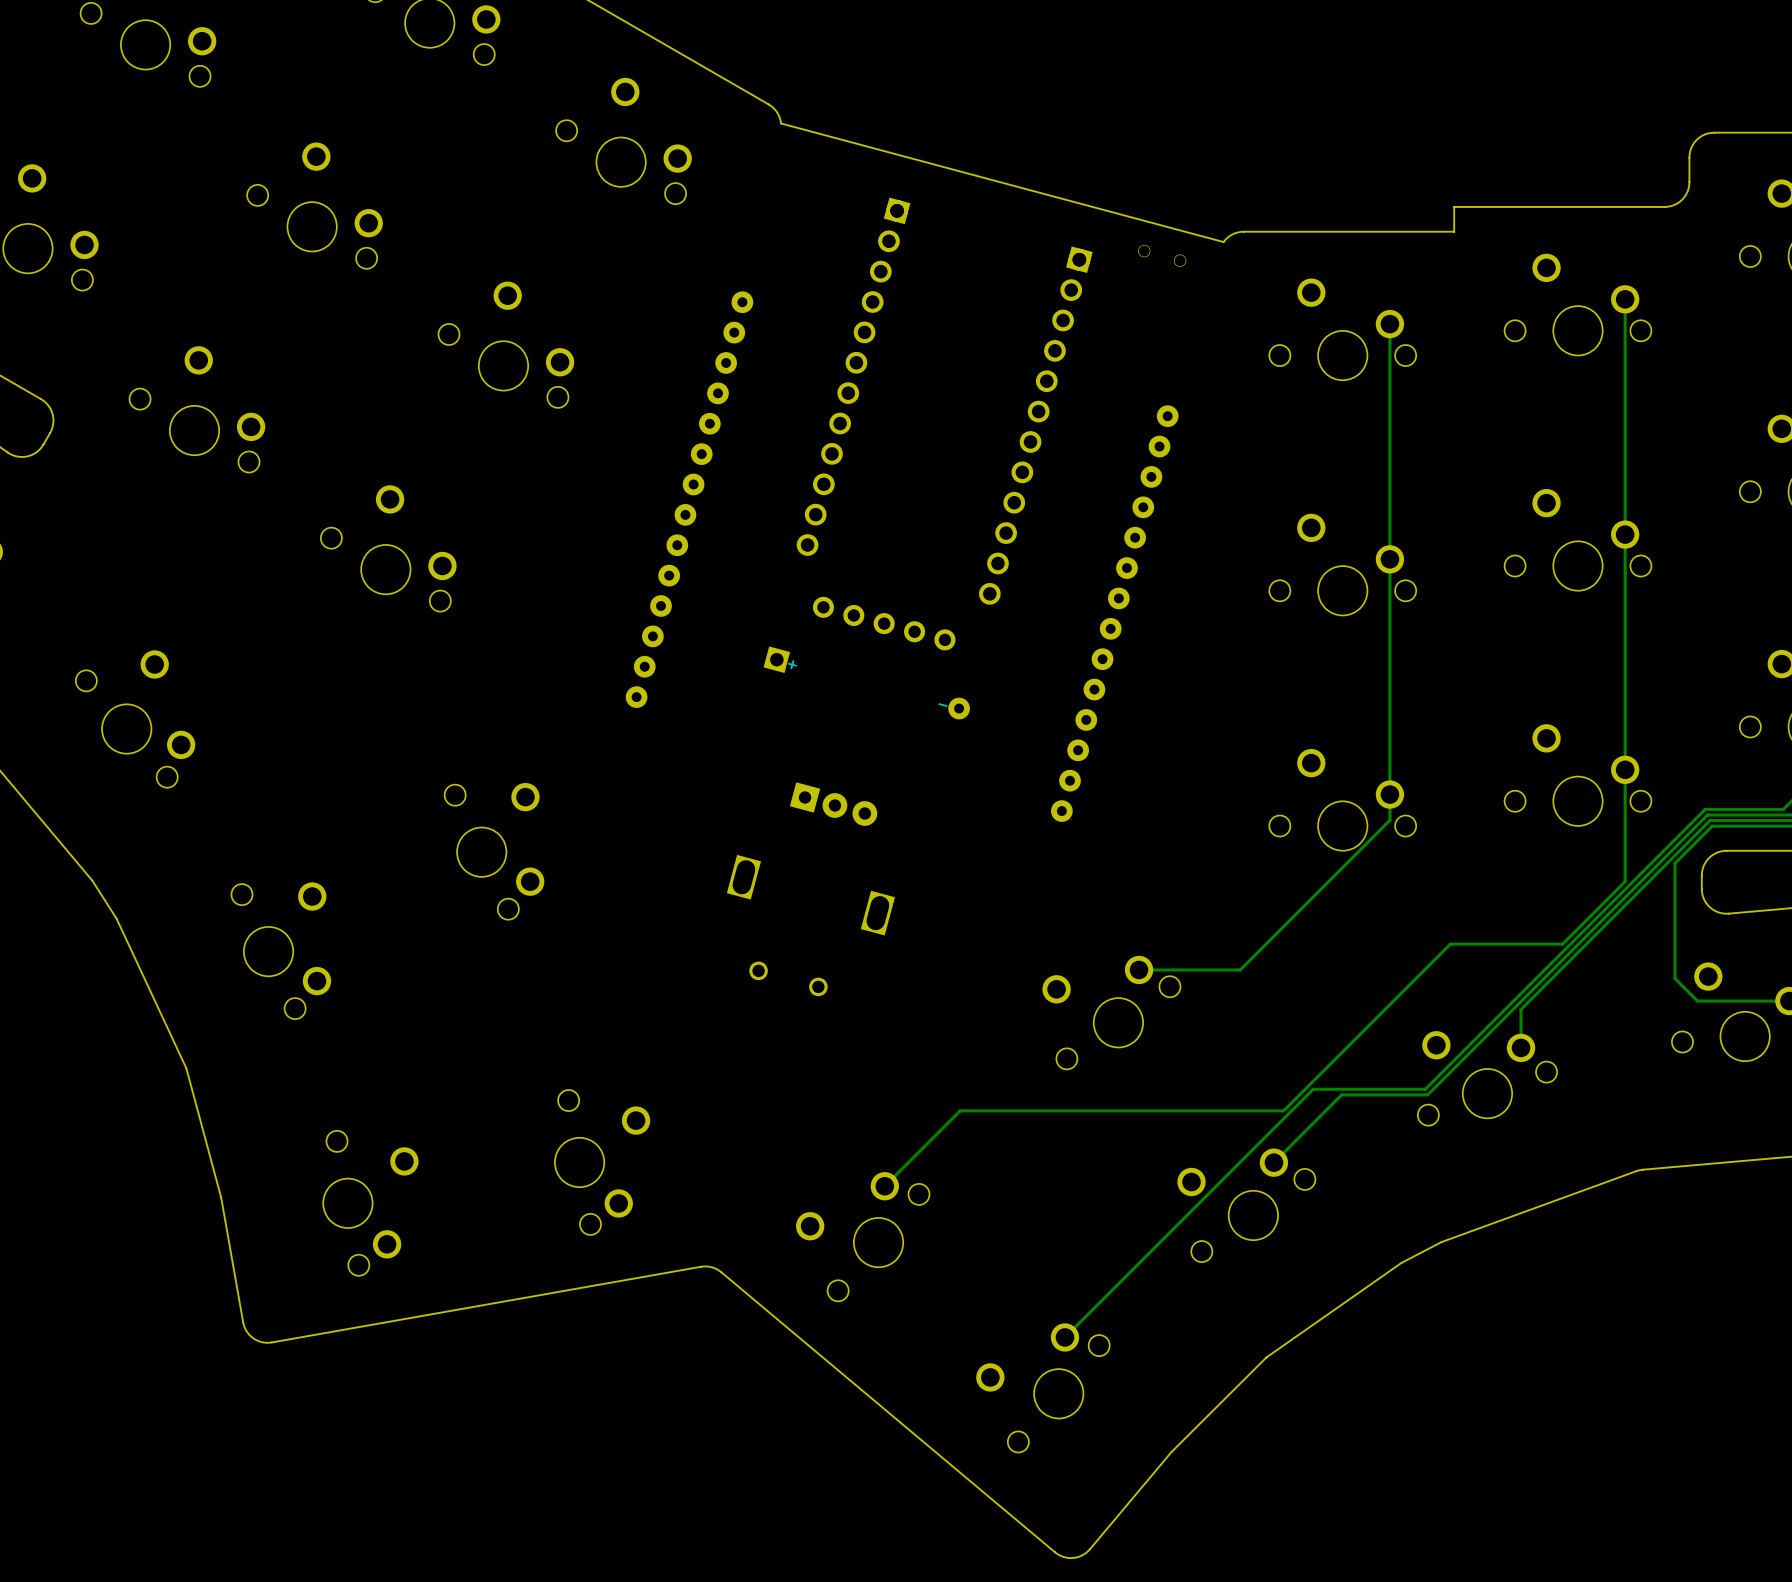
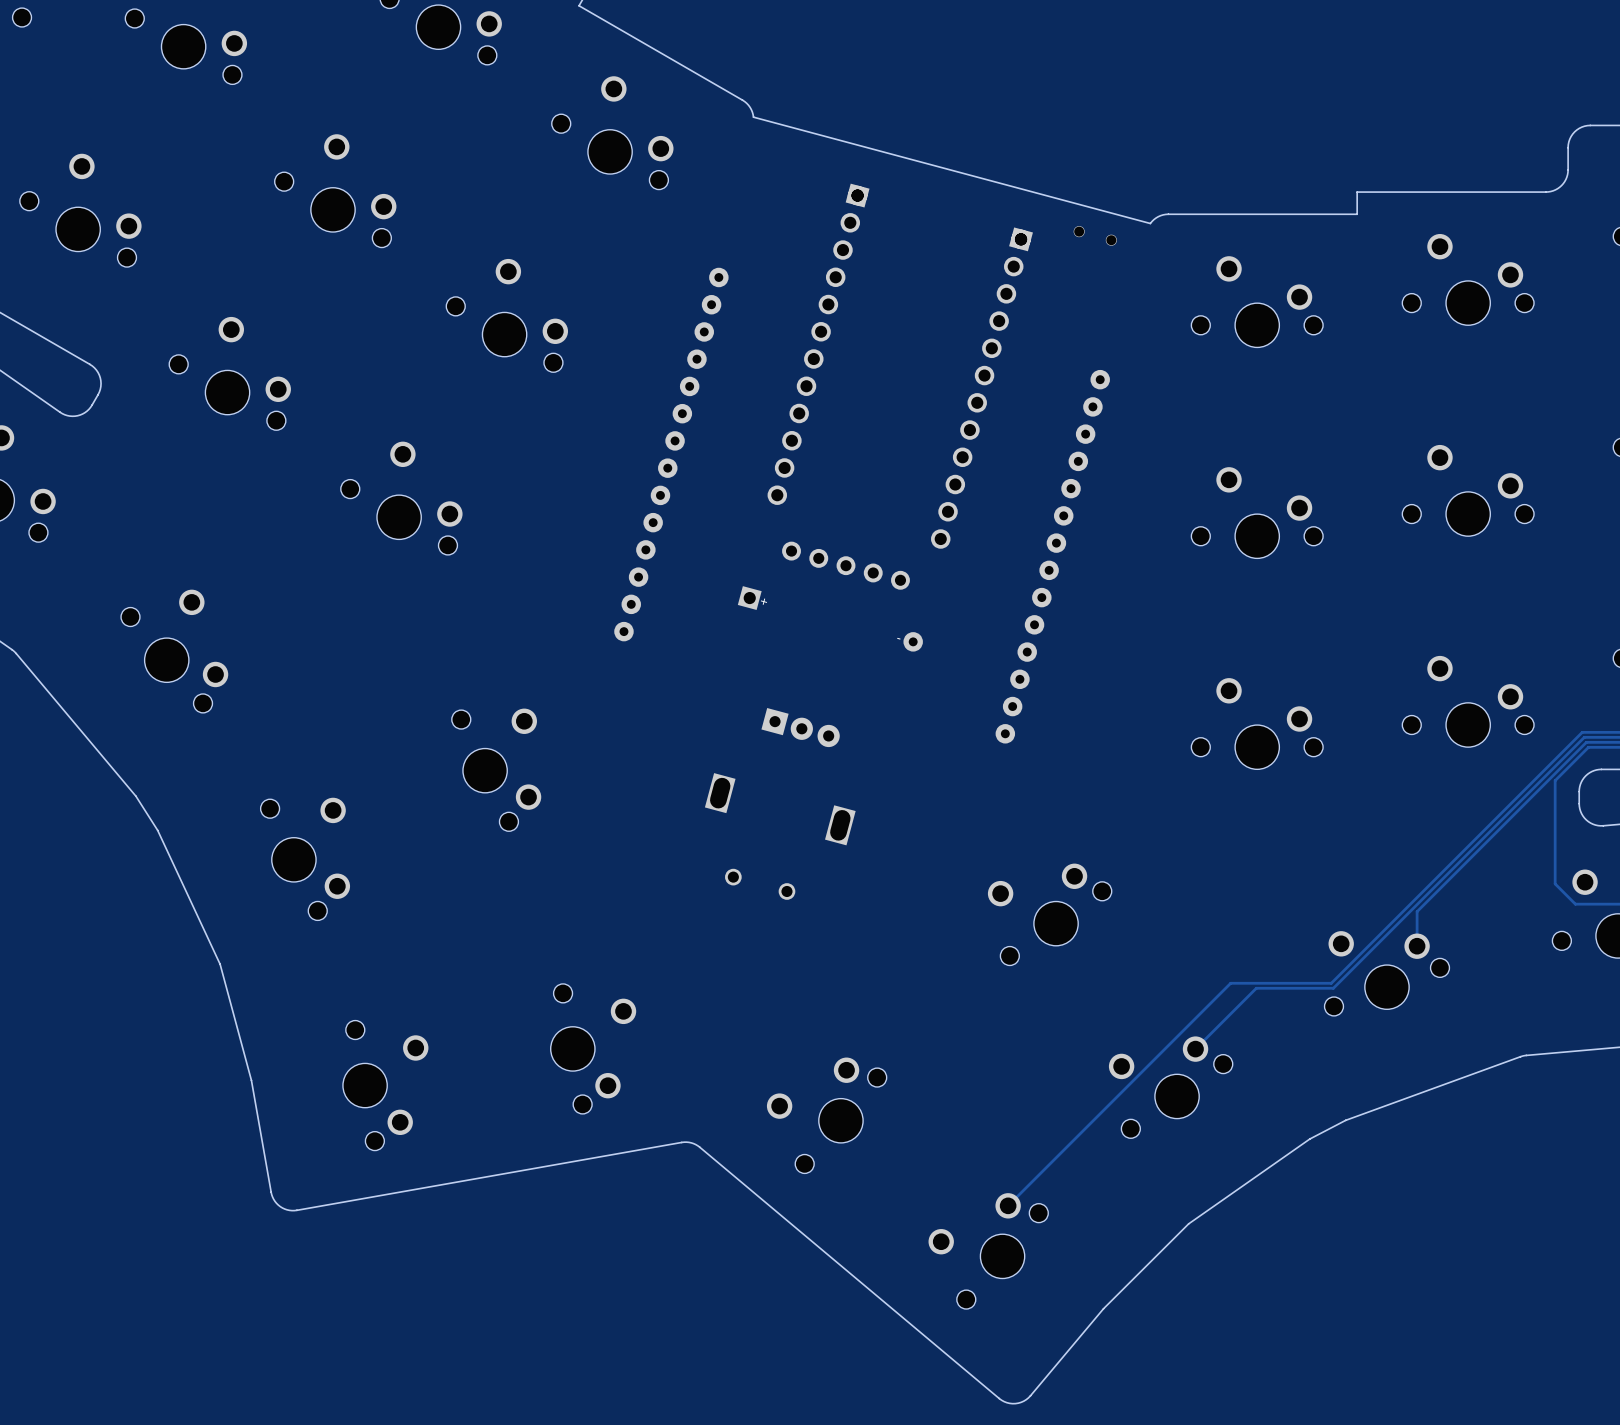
track: (1625, 299) (1625, 881) (1562, 944) (1450, 944) (1283, 1110) (960, 1110) (884, 1186) -> none
track: (1389, 324) (1389, 820) (1240, 969) (1139, 969) -> none

